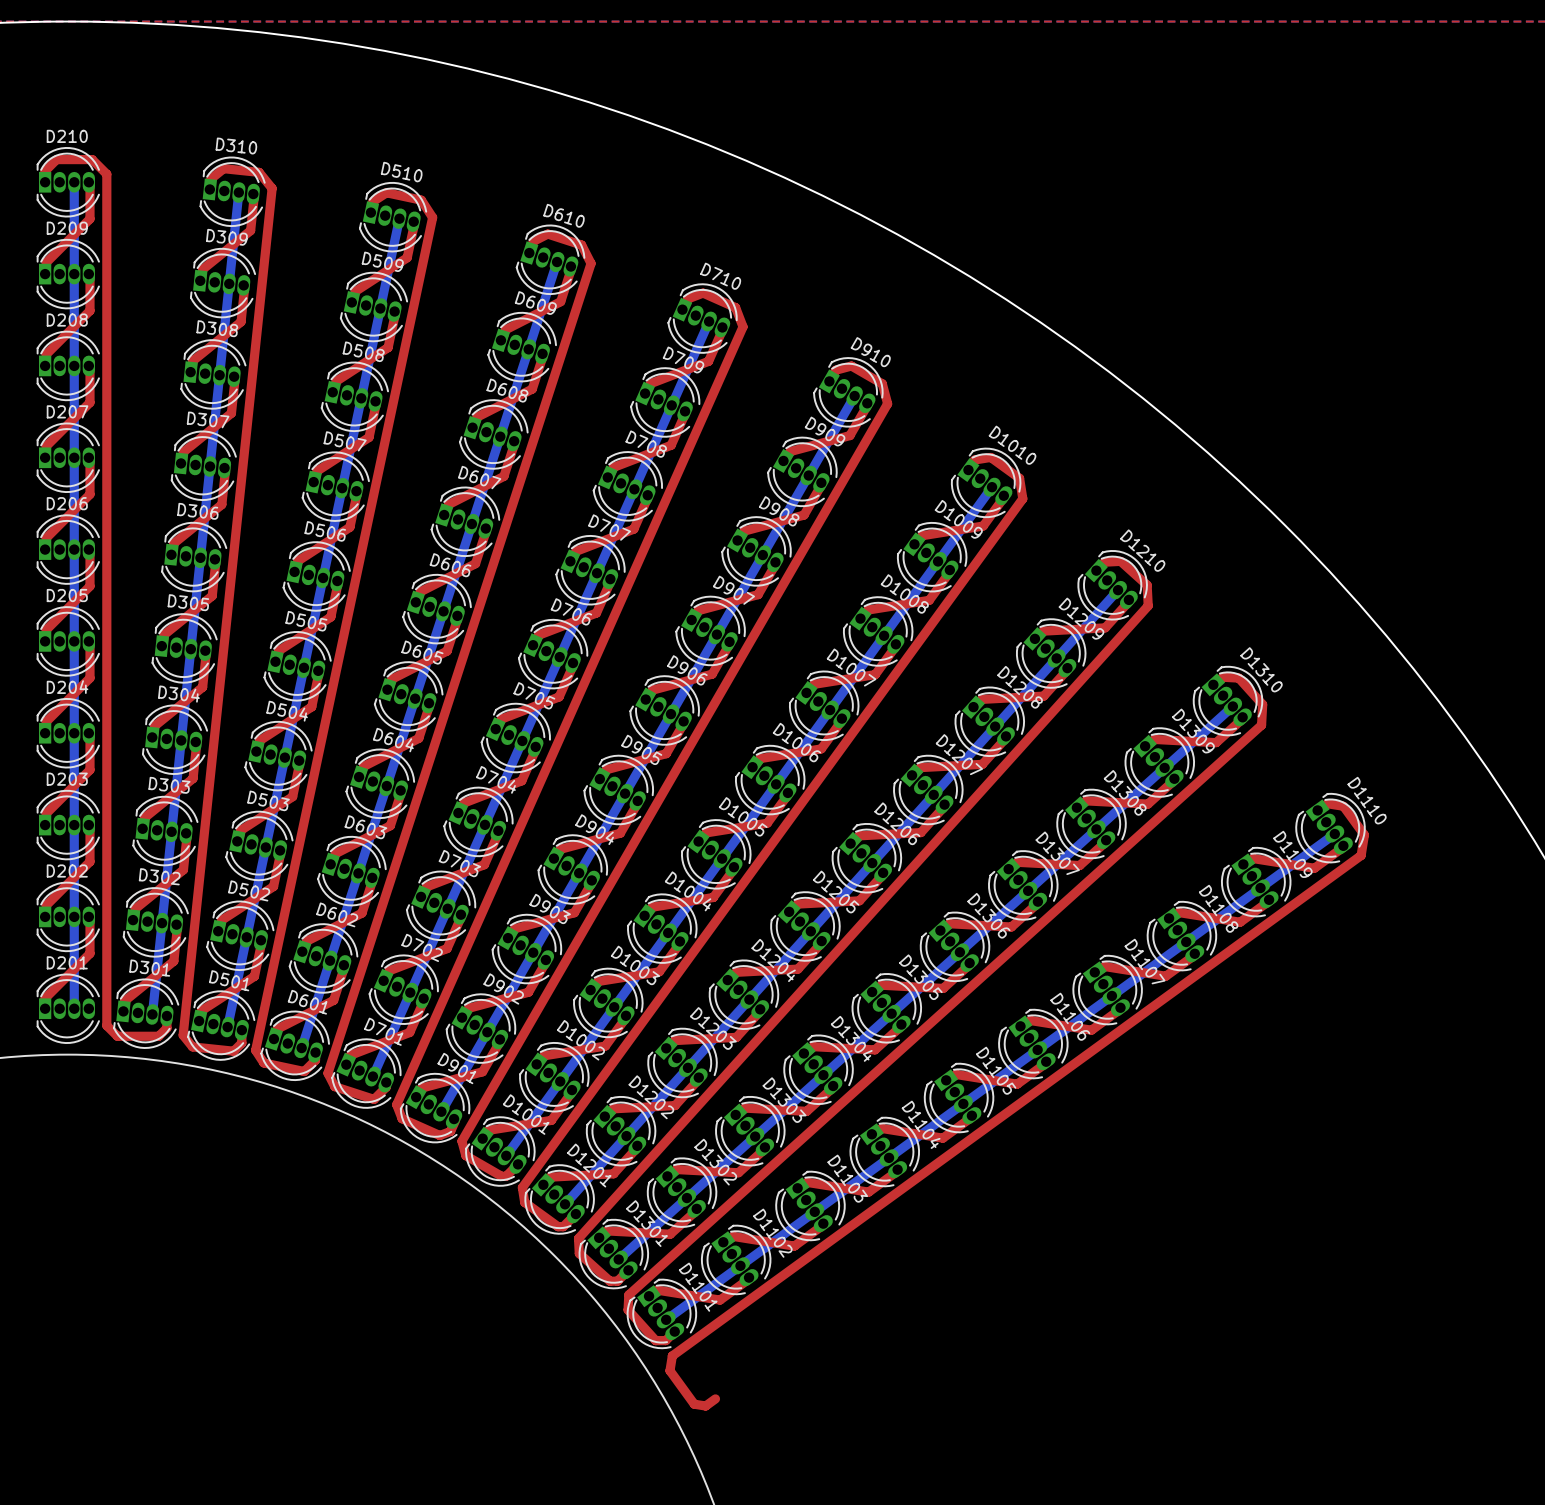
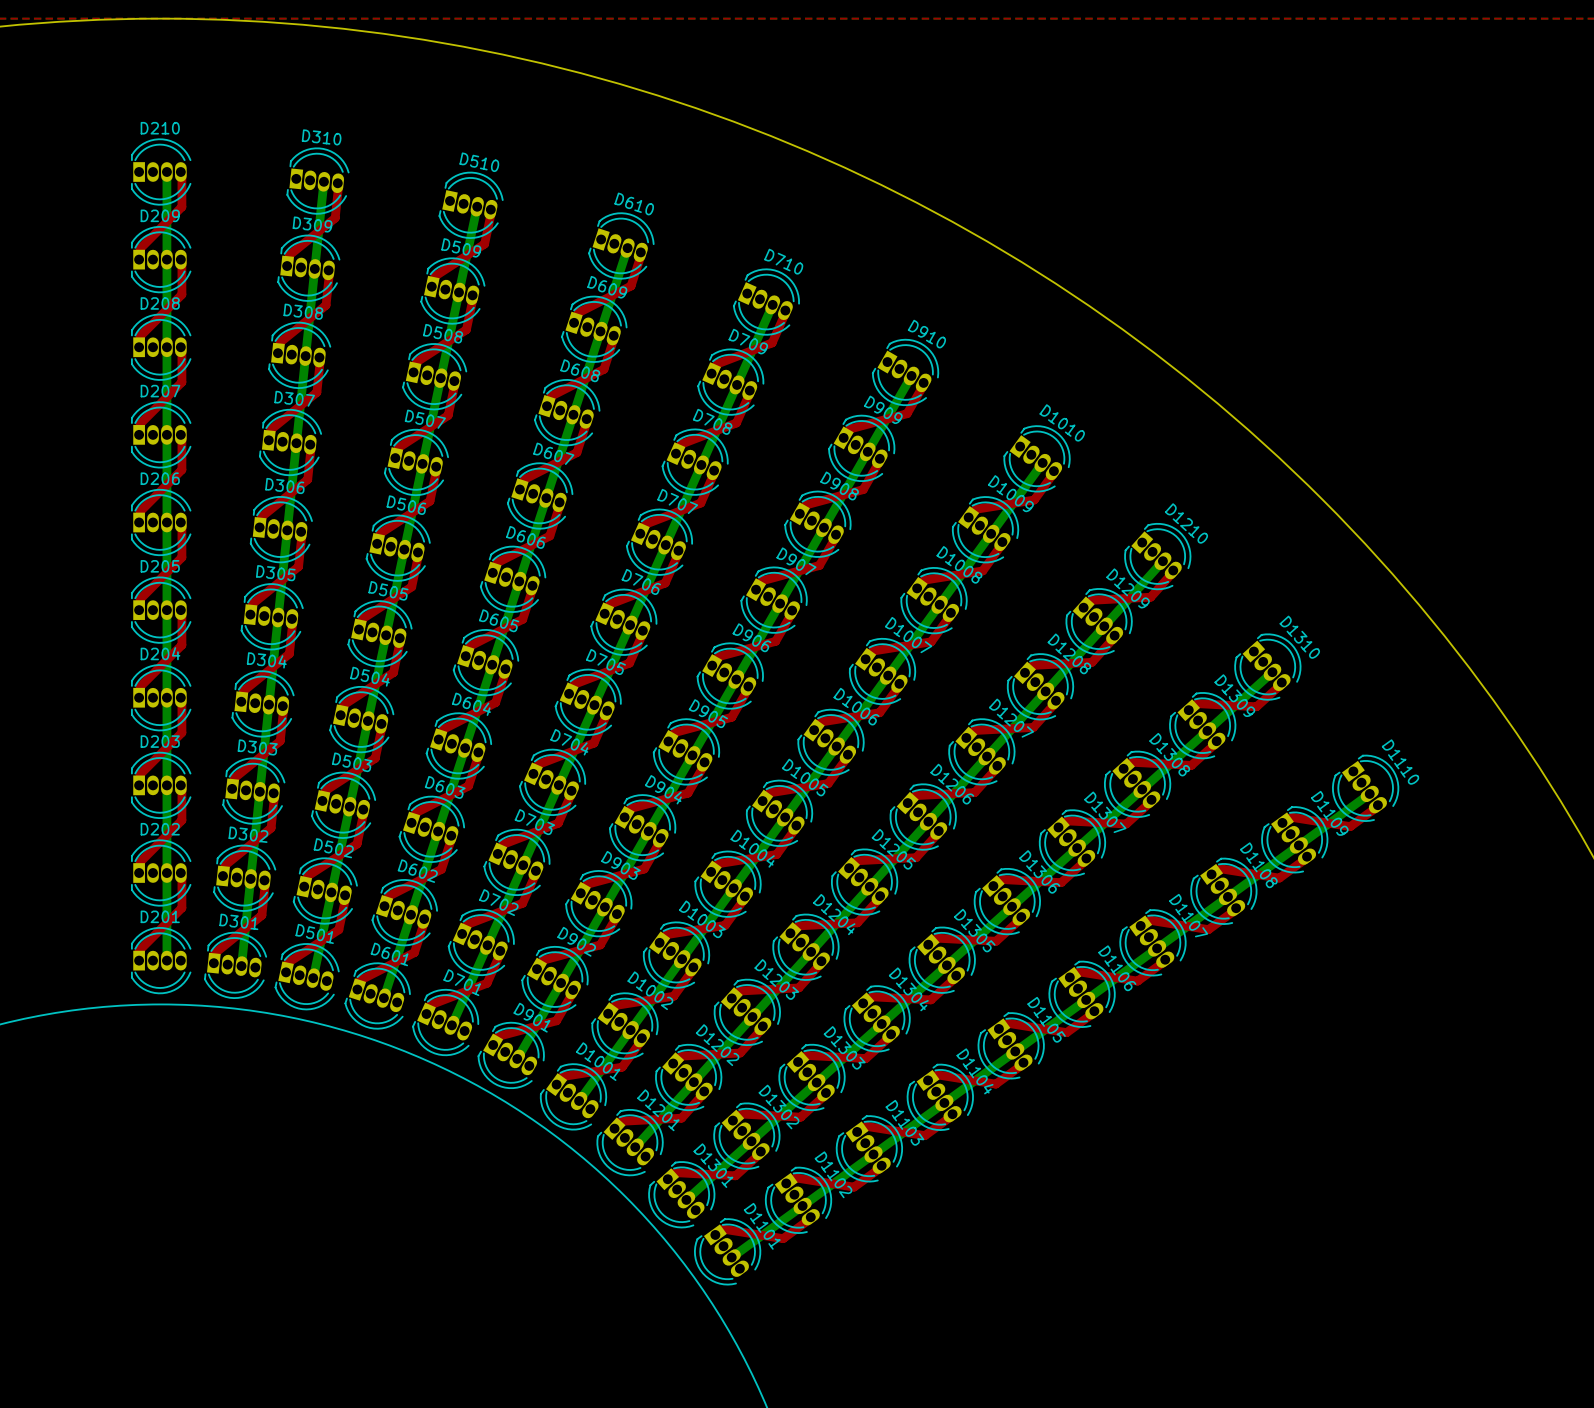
top track: (45, 182) (45, 171) (56, 159) (92, 159) (106, 174) (106, 1025) (117, 1036) (158, 1036) (166, 1028) (166, 1015) -> none
top track: (209, 190) (211, 178) (223, 168) (259, 172) (272, 188) (183, 1035) (192, 1046) (233, 1051) (241, 1043) (241, 1030) -> none
top track: (370, 212) (372, 201) (386, 192) (421, 200) (432, 217) (255, 1050) (263, 1062) (304, 1071) (315, 1060) (315, 1052) -> none
top track: (529, 252) (533, 241) (547, 234) (581, 245) (591, 263) (327, 1073) (334, 1086) (374, 1099) (386, 1087) (386, 1082) -> none
top track: (683, 309) (687, 298) (703, 293) (735, 307) (743, 326) (396, 1104) (402, 1118) (439, 1135) (450, 1131) (455, 1120) -> none
top track: (830, 379) (835, 370) (851, 366) (882, 383) (887, 403) (461, 1141) (465, 1155) (501, 1176) (506, 1176) (518, 1164) -> none
top track: (968, 469) (974, 459) (990, 457) (1019, 478) (1022, 498) (522, 1187) (524, 1202) (558, 1226) (563, 1226) (575, 1214) -> none
top track: (1097, 570) (1104, 562) (1120, 561) (1147, 585) (1148, 605) (578, 1238) (579, 1253) (610, 1281) (617, 1281) (628, 1270) -> none
top track: (1214, 684) (1222, 677) (1238, 678) (1262, 704) (1261, 725) (628, 1294) (628, 1309) (655, 1340) (665, 1340) (674, 1331) -> none
top track: (1318, 810) (1327, 803) (1343, 806) (1364, 835) (1361, 855) (672, 1355) (669, 1370) (694, 1404) (705, 1406) (715, 1398) -> none

